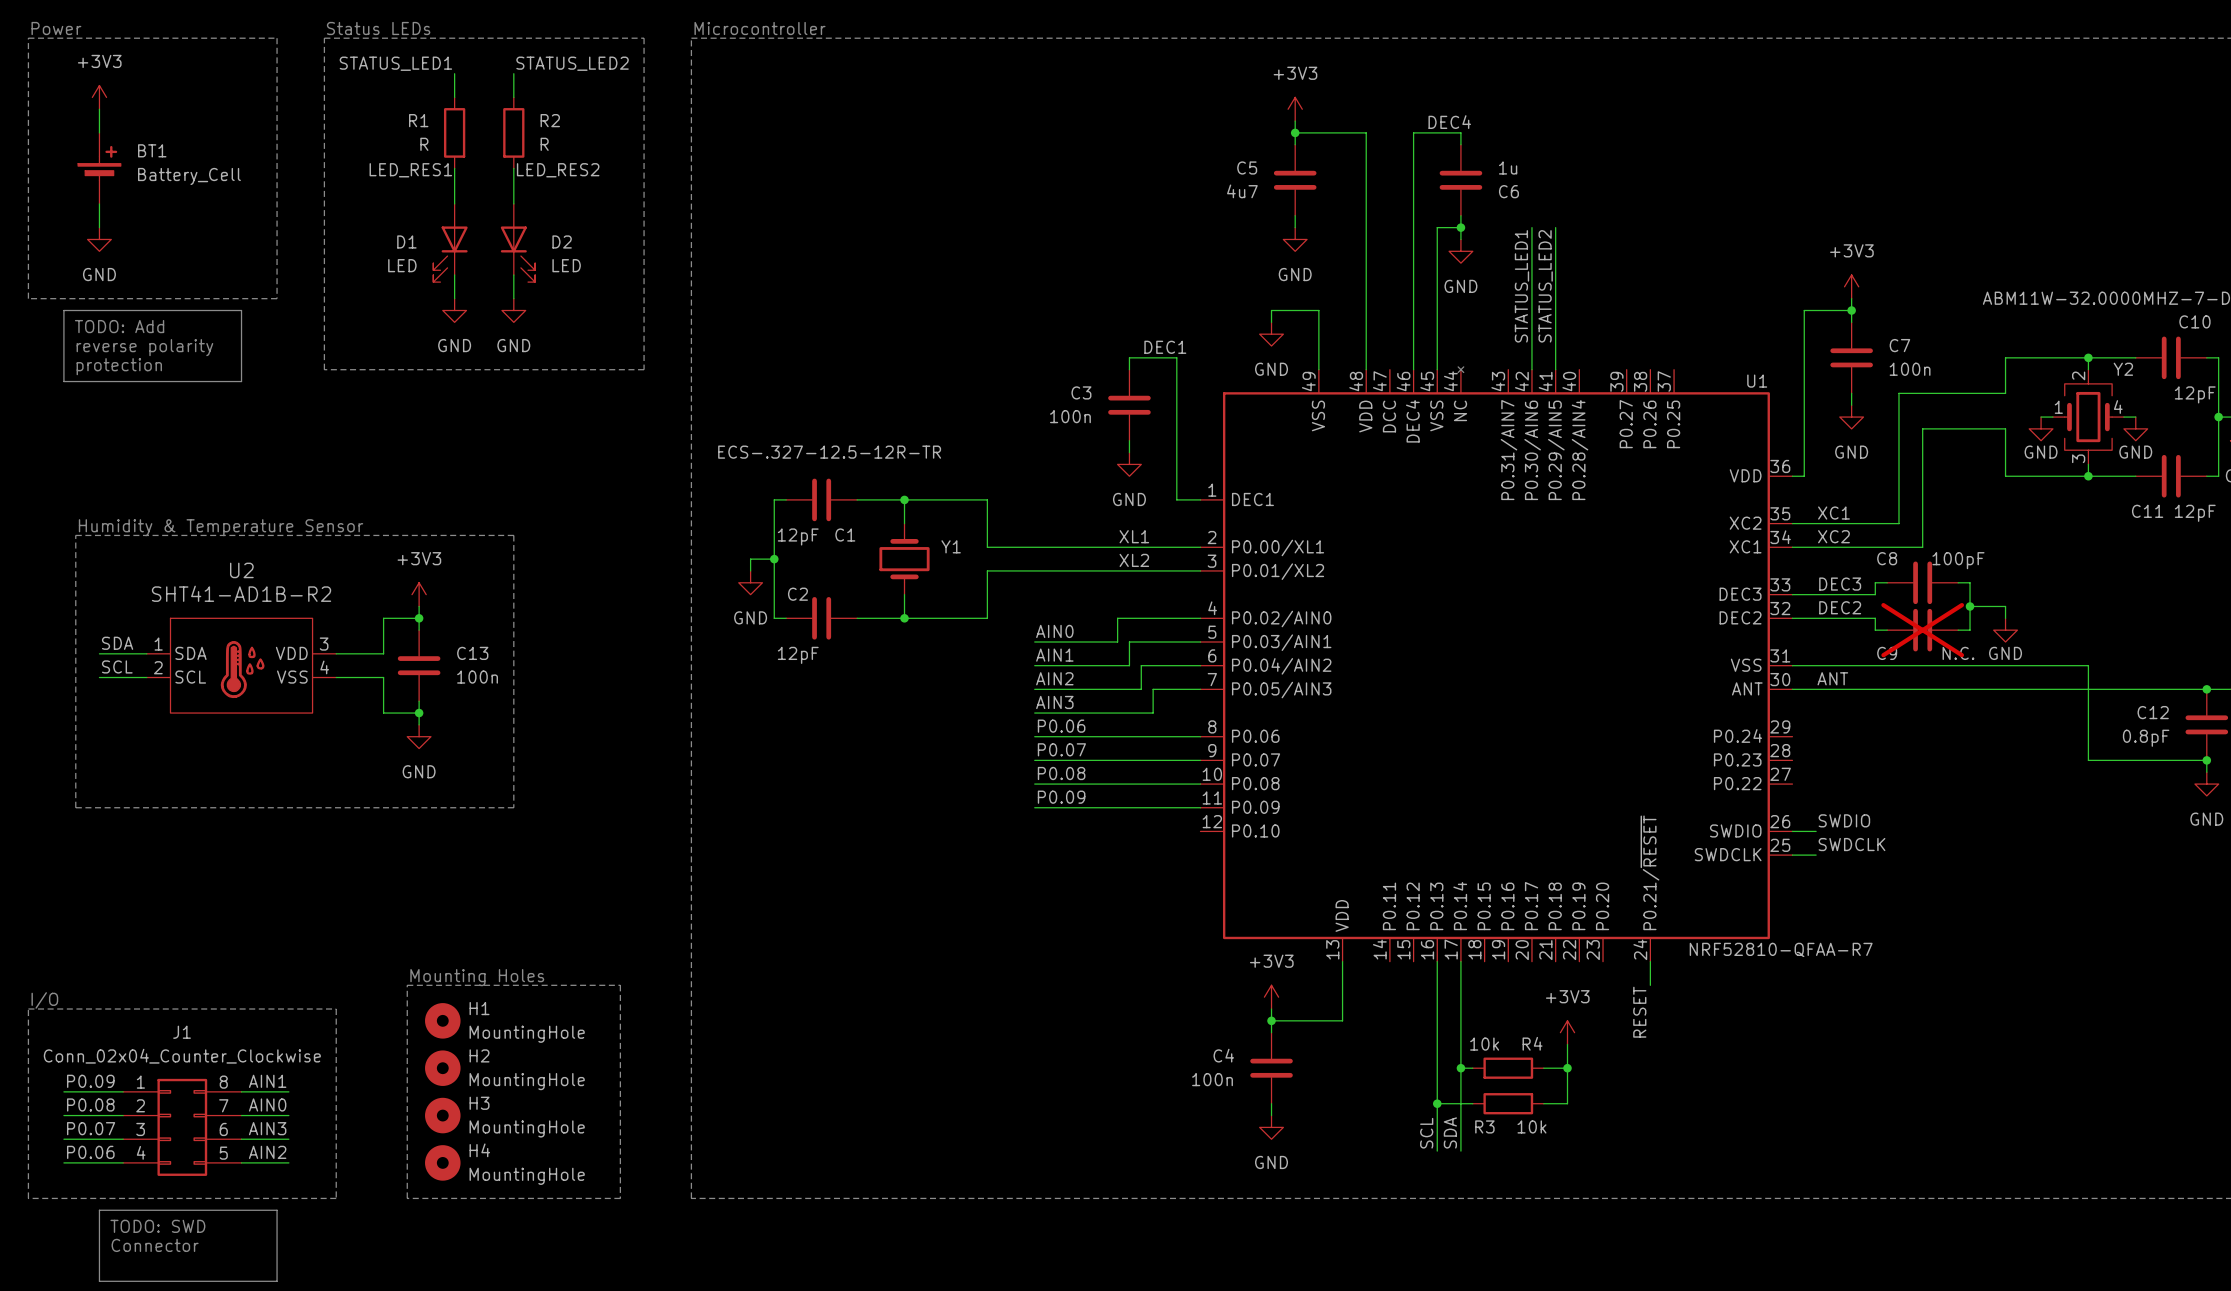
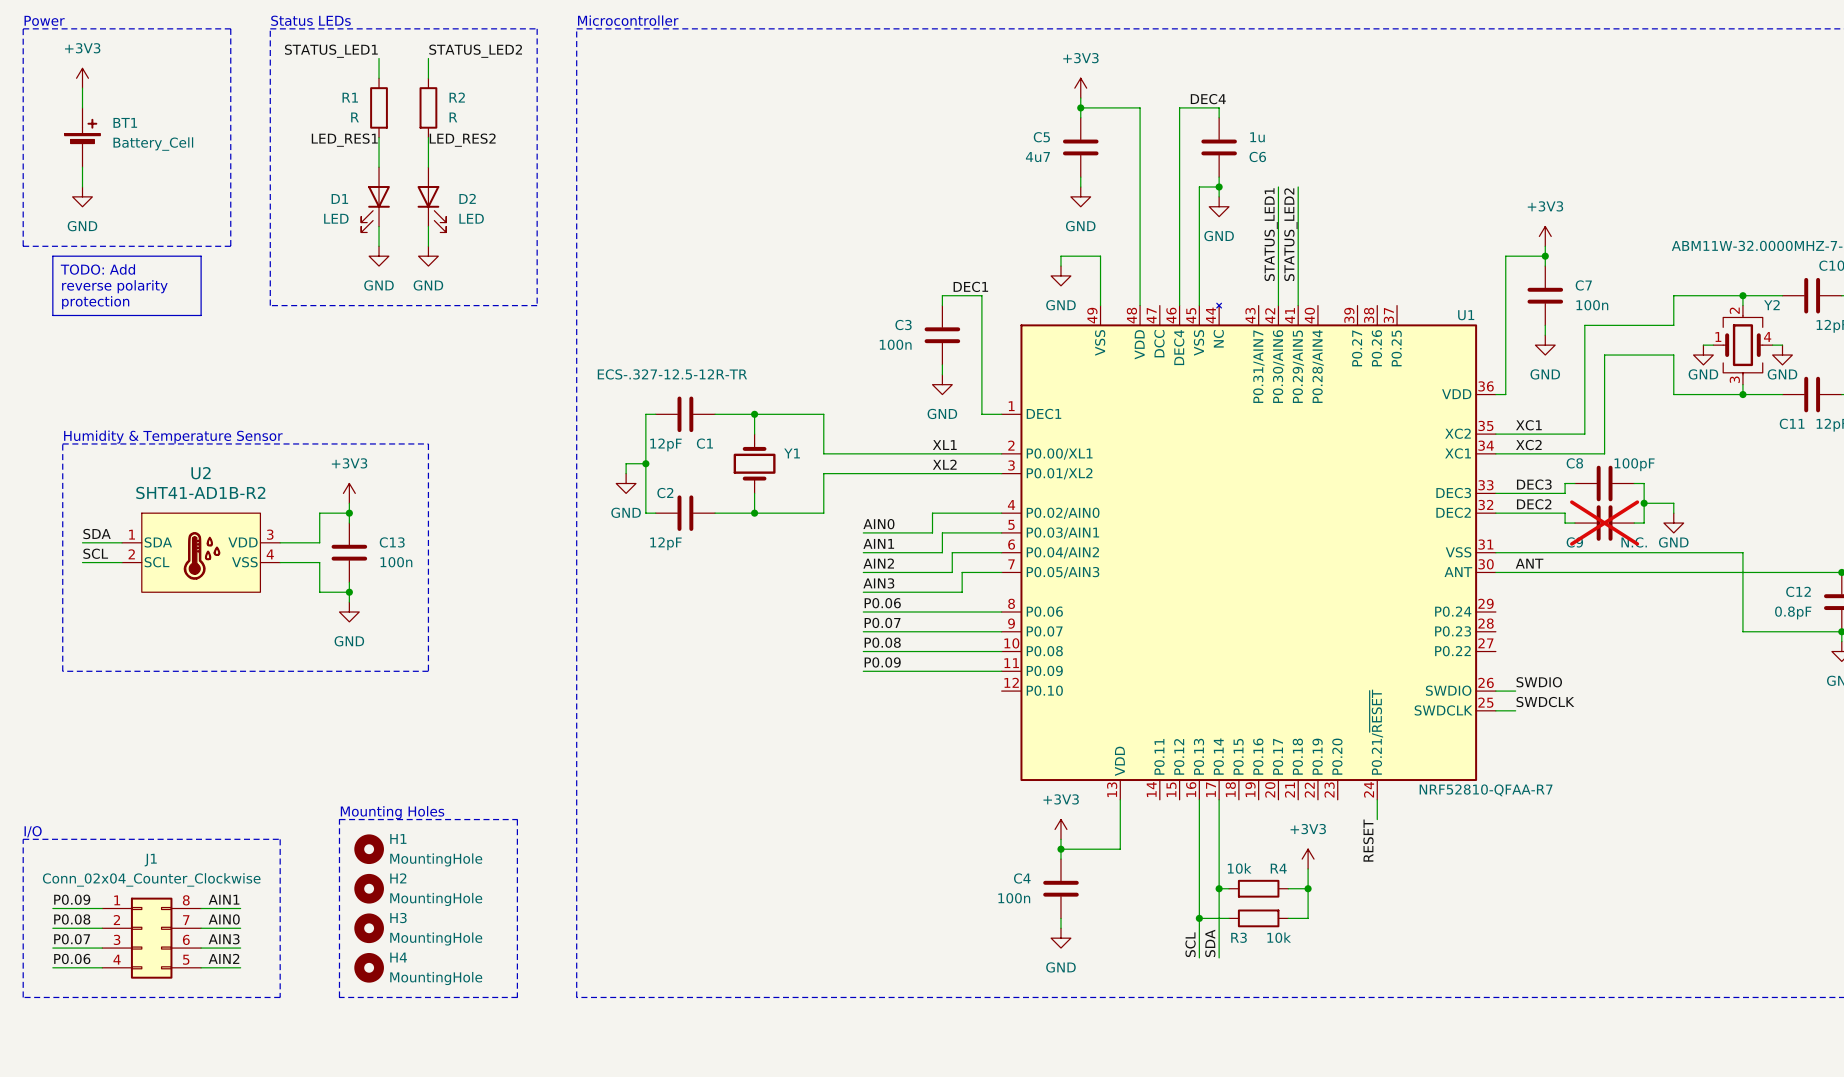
line: (99, 1210) (277, 1210) (277, 1281) (99, 1281) (99, 1210) -> none
text: TODO: SWD (157, 1226) -> none
text: Connector (155, 1245) -> none

